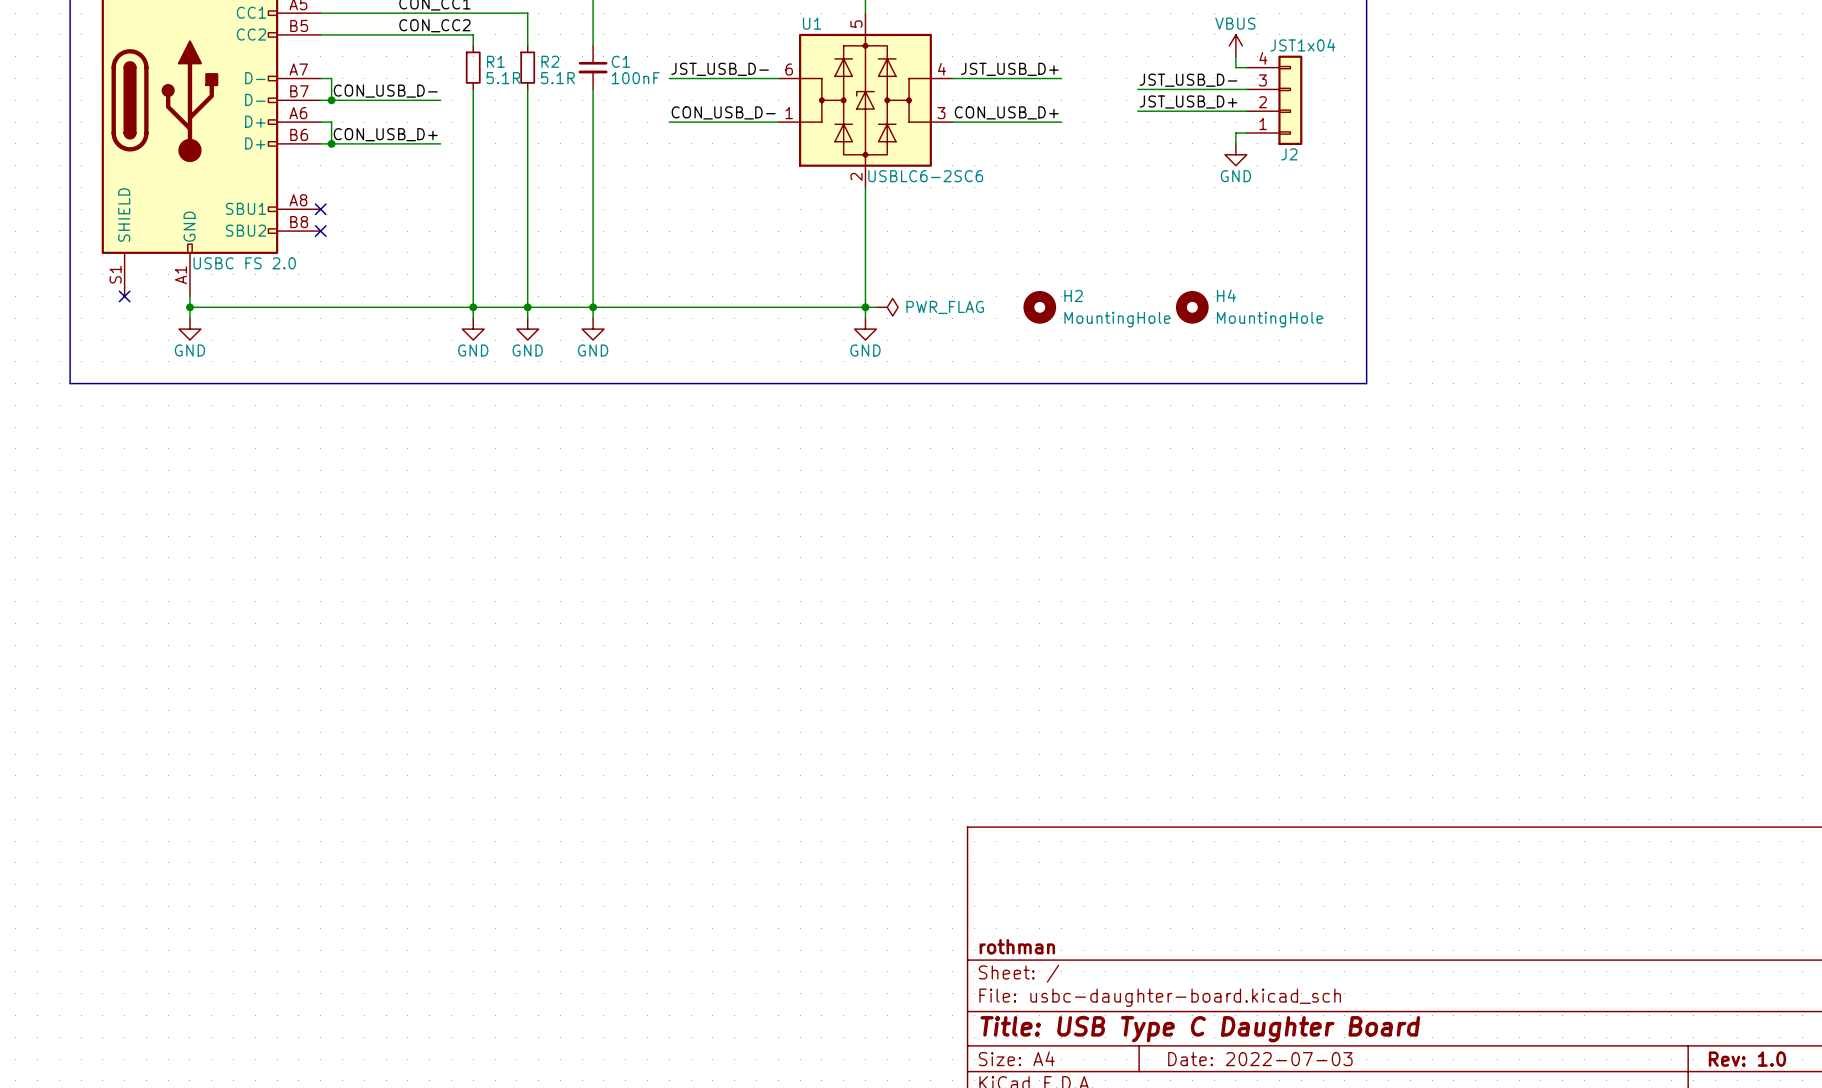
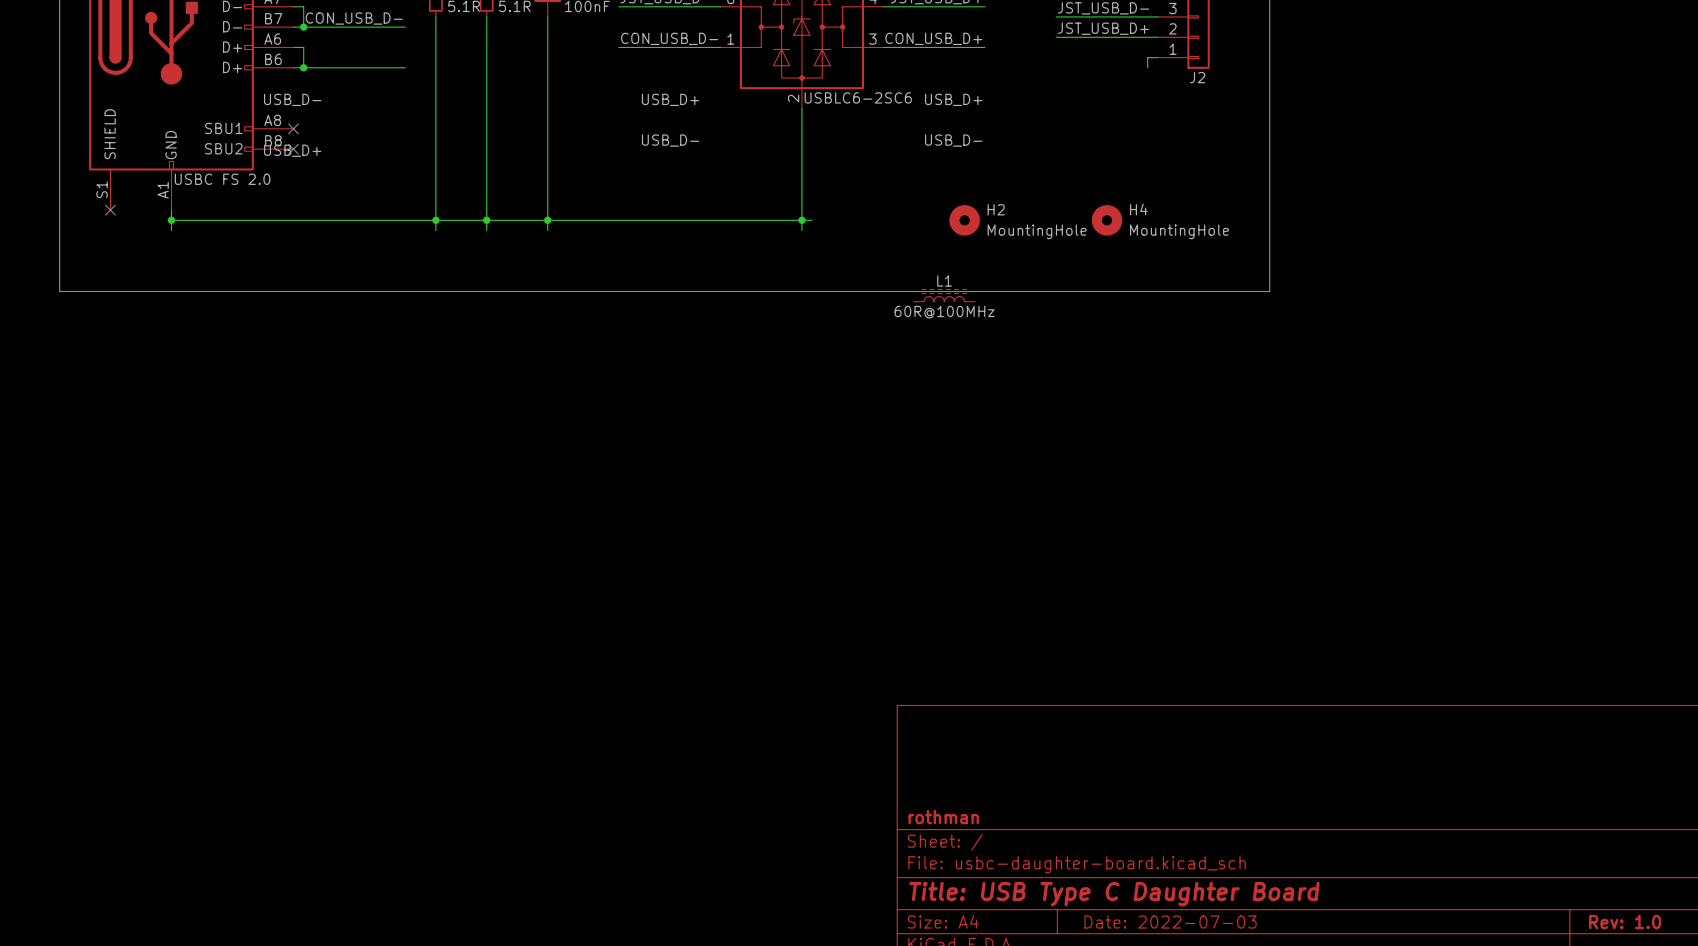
label: CON_USB_D+ (385, 134) -> none
power symbol: GND (1235, 154) -> none
label: none -> USB_D- (292, 99)
label: none -> USB_D+ (670, 99)
label: none -> USB_D+ (953, 99)
label: none -> USB_D- (670, 140)
label: none -> USB_D- (953, 140)
label: none -> USB_D+ (292, 150)
power symbol: PWR_FLAG (887, 307) -> none
power symbol: GND (189, 329) -> none
power symbol: GND (473, 329) -> none
power symbol: GND (527, 329) -> none
power symbol: GND (593, 329) -> none
power symbol: GND (865, 329) -> none
L1: none -> 60R@100MHz (944, 295)

